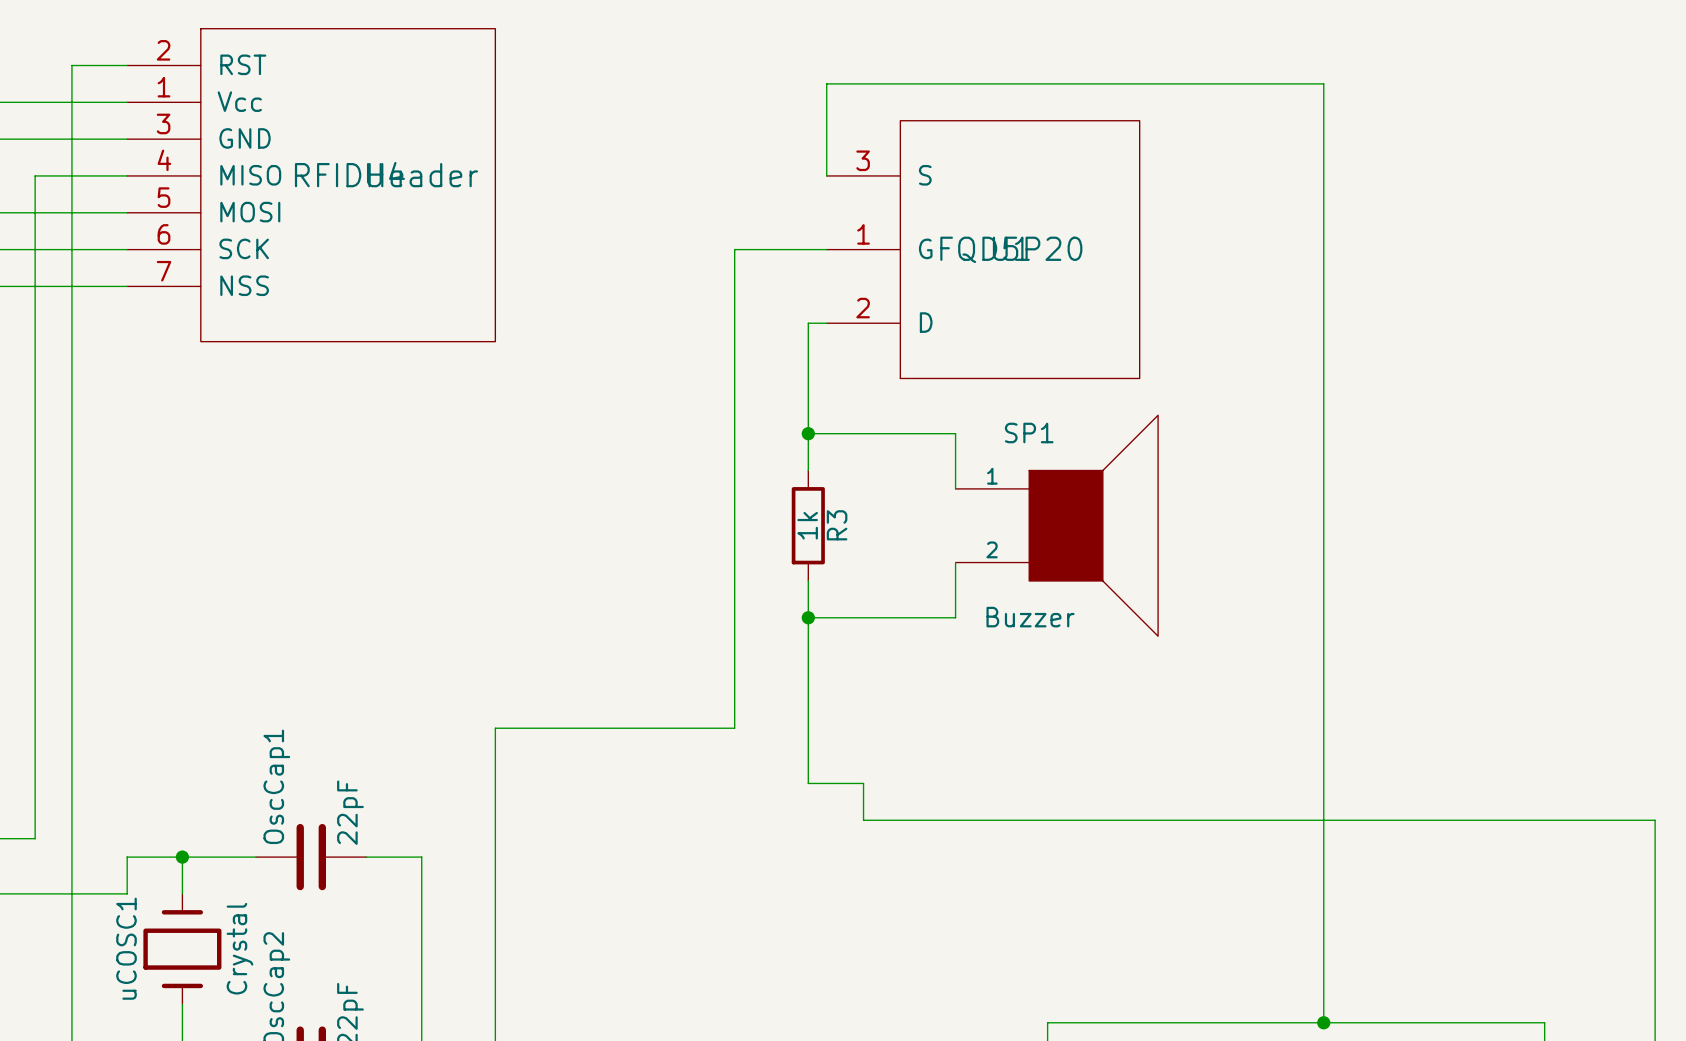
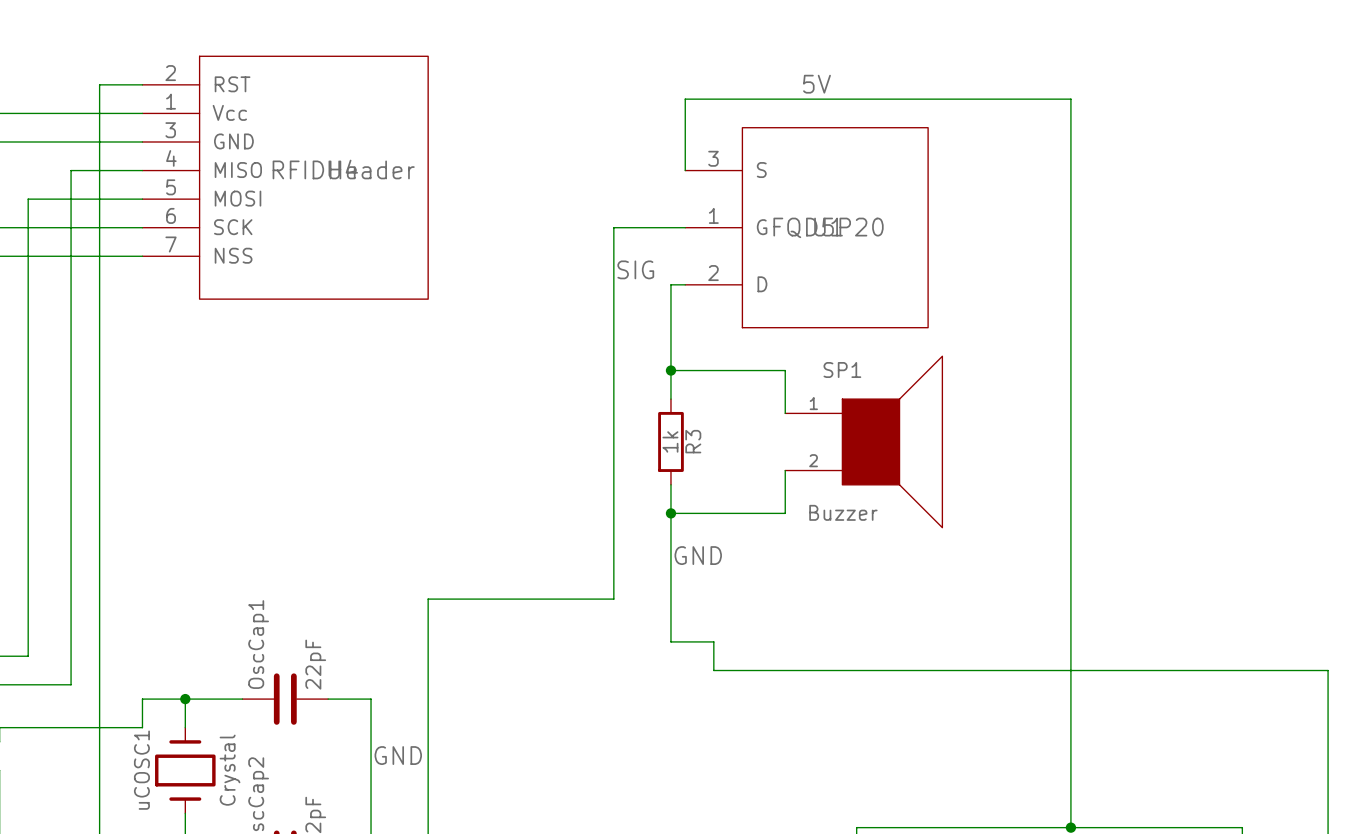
label: none -> 5V (816, 84)
label: none -> SIG (635, 269)
label: none -> GND (698, 555)
label: none -> GND (398, 755)

